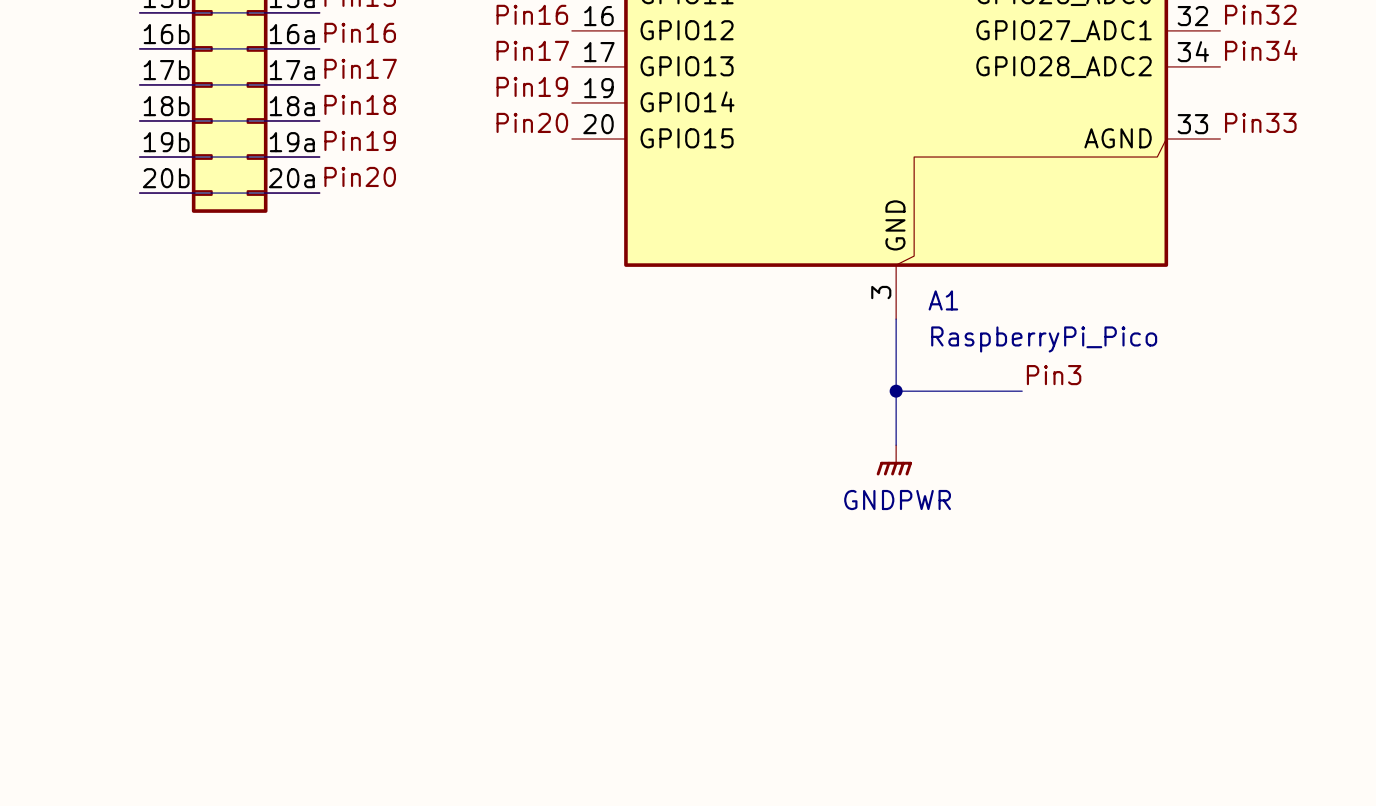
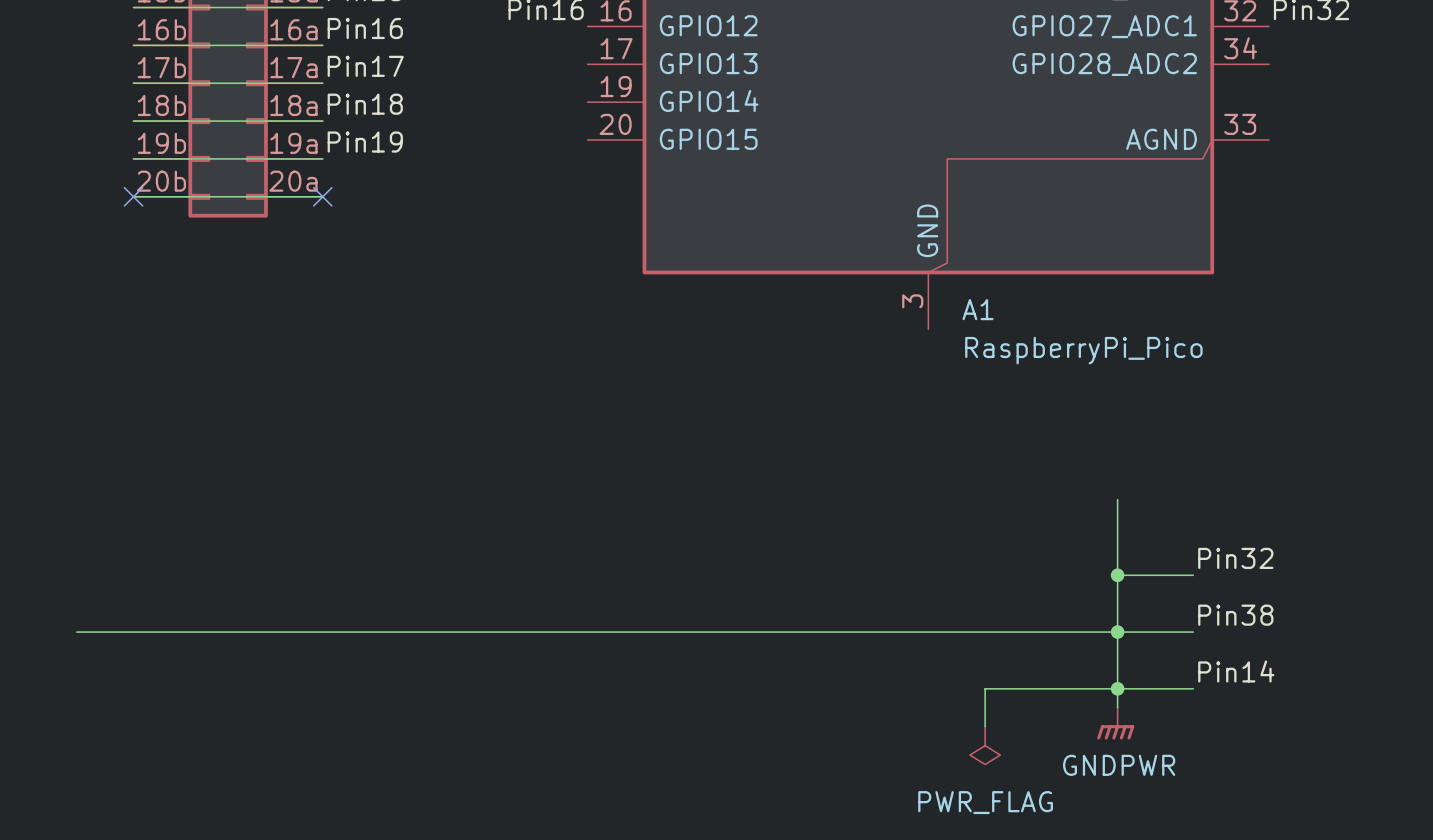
label: Pin17 (532, 50) -> none
label: Pin34 (1261, 50) -> none
label: Pin19 (532, 86) -> none
label: Pin20 (532, 122) -> none
label: Pin33 (1260, 122) -> none
label: Pin20 (360, 176) -> none
no-connect mark: none -> (133, 196)
no-connect mark: none -> (322, 196)
wire: (896, 319) (896, 445) -> none
label: Pin3 (1054, 375) -> none
wire: (896, 391) (1022, 391) -> none
junction: (896, 391) -> none
power symbol position: GNDPWR (894, 460) -> GNDPWR (1115, 723)
wire: none -> (1117, 499) (1117, 707)
label: none -> Pin32 (1235, 558)
wire: none -> (1117, 575) (1193, 575)
junction: none -> (1117, 575)
label: none -> Pin38 (1235, 615)
wire: none -> (76, 632) (1193, 632)
junction: none -> (1117, 632)
label: none -> Pin14 (1236, 671)
junction: none -> (1117, 688)
wire: none -> (1193, 688) (985, 688) (985, 726)
power symbol: none -> PWR_FLAG (985, 745)

